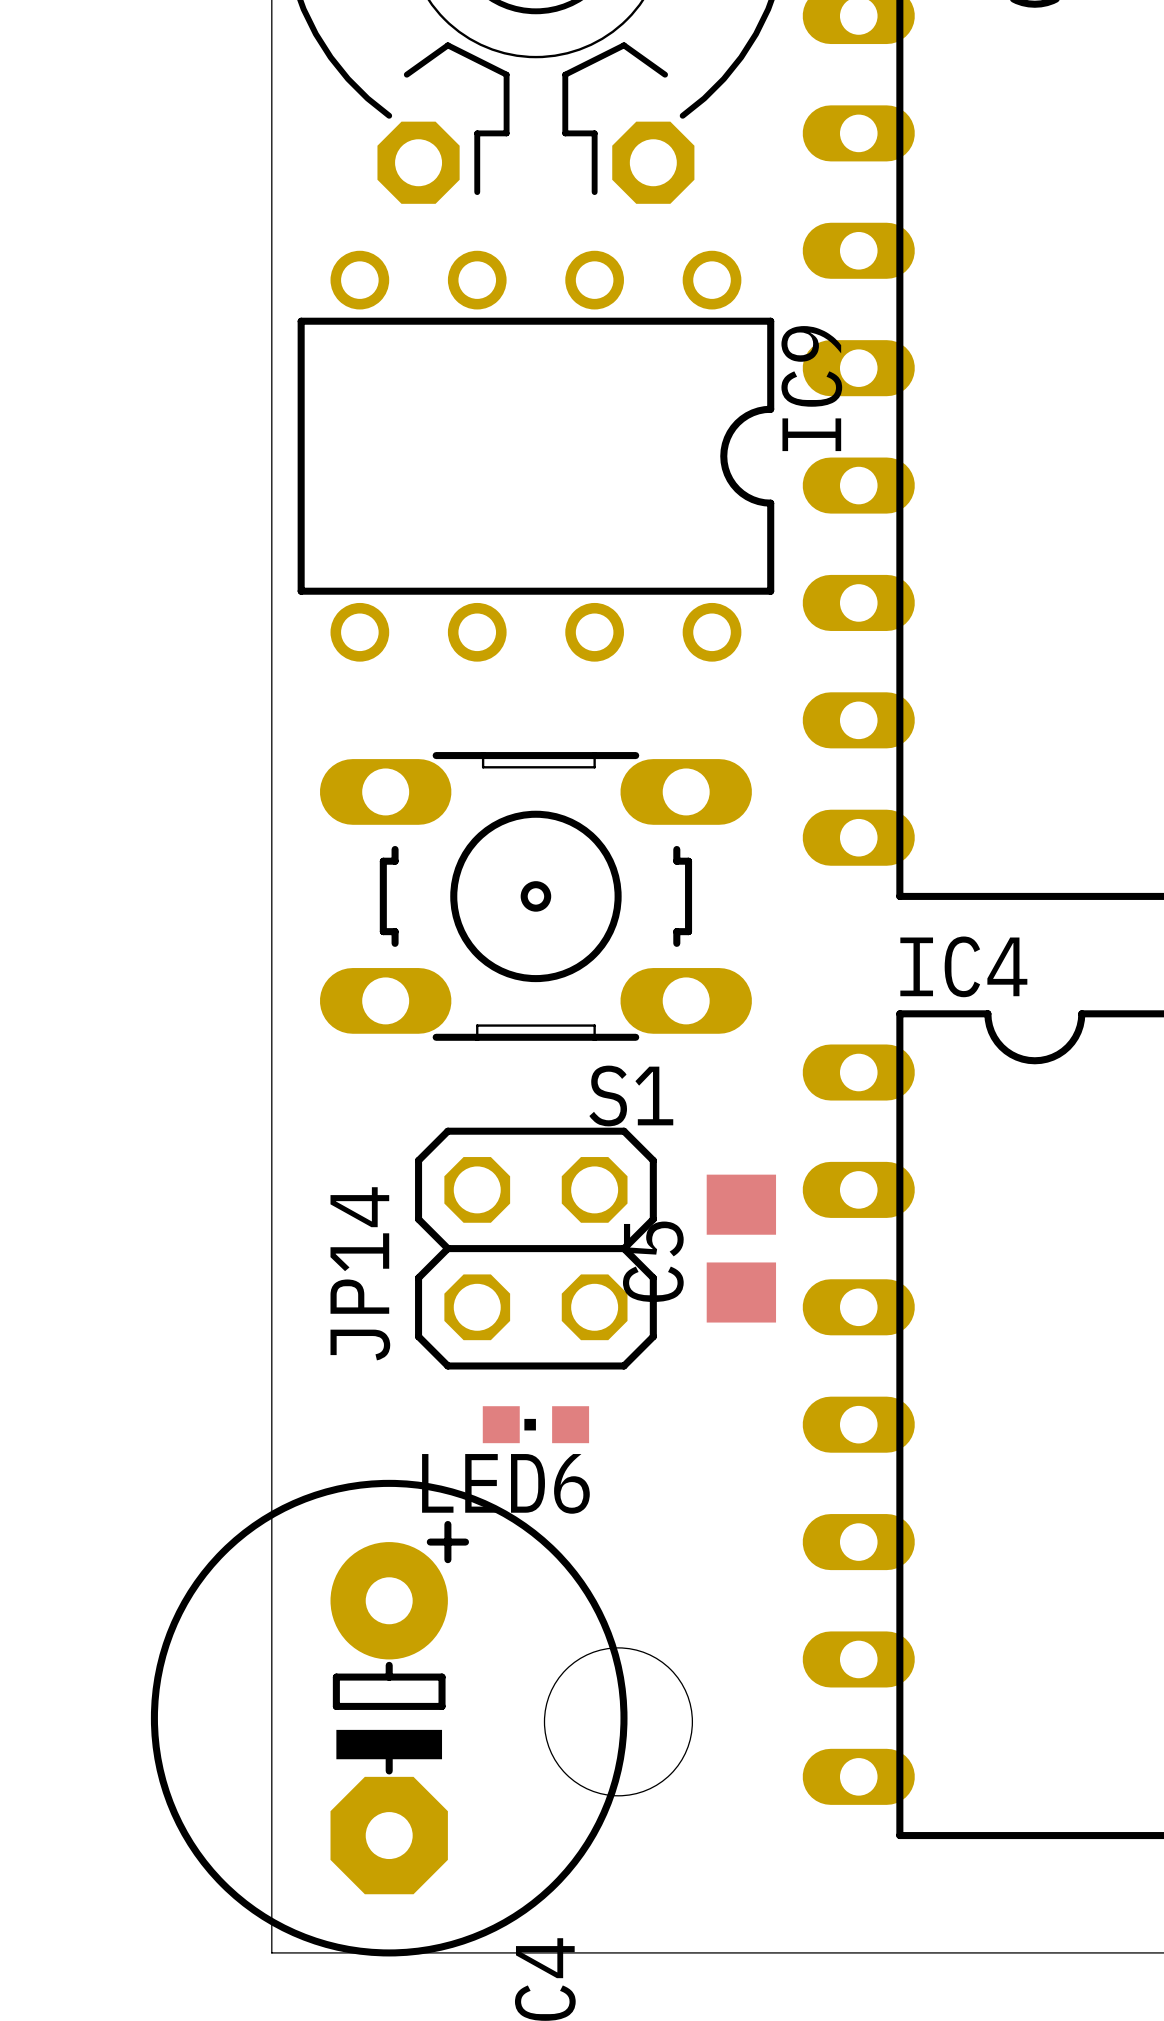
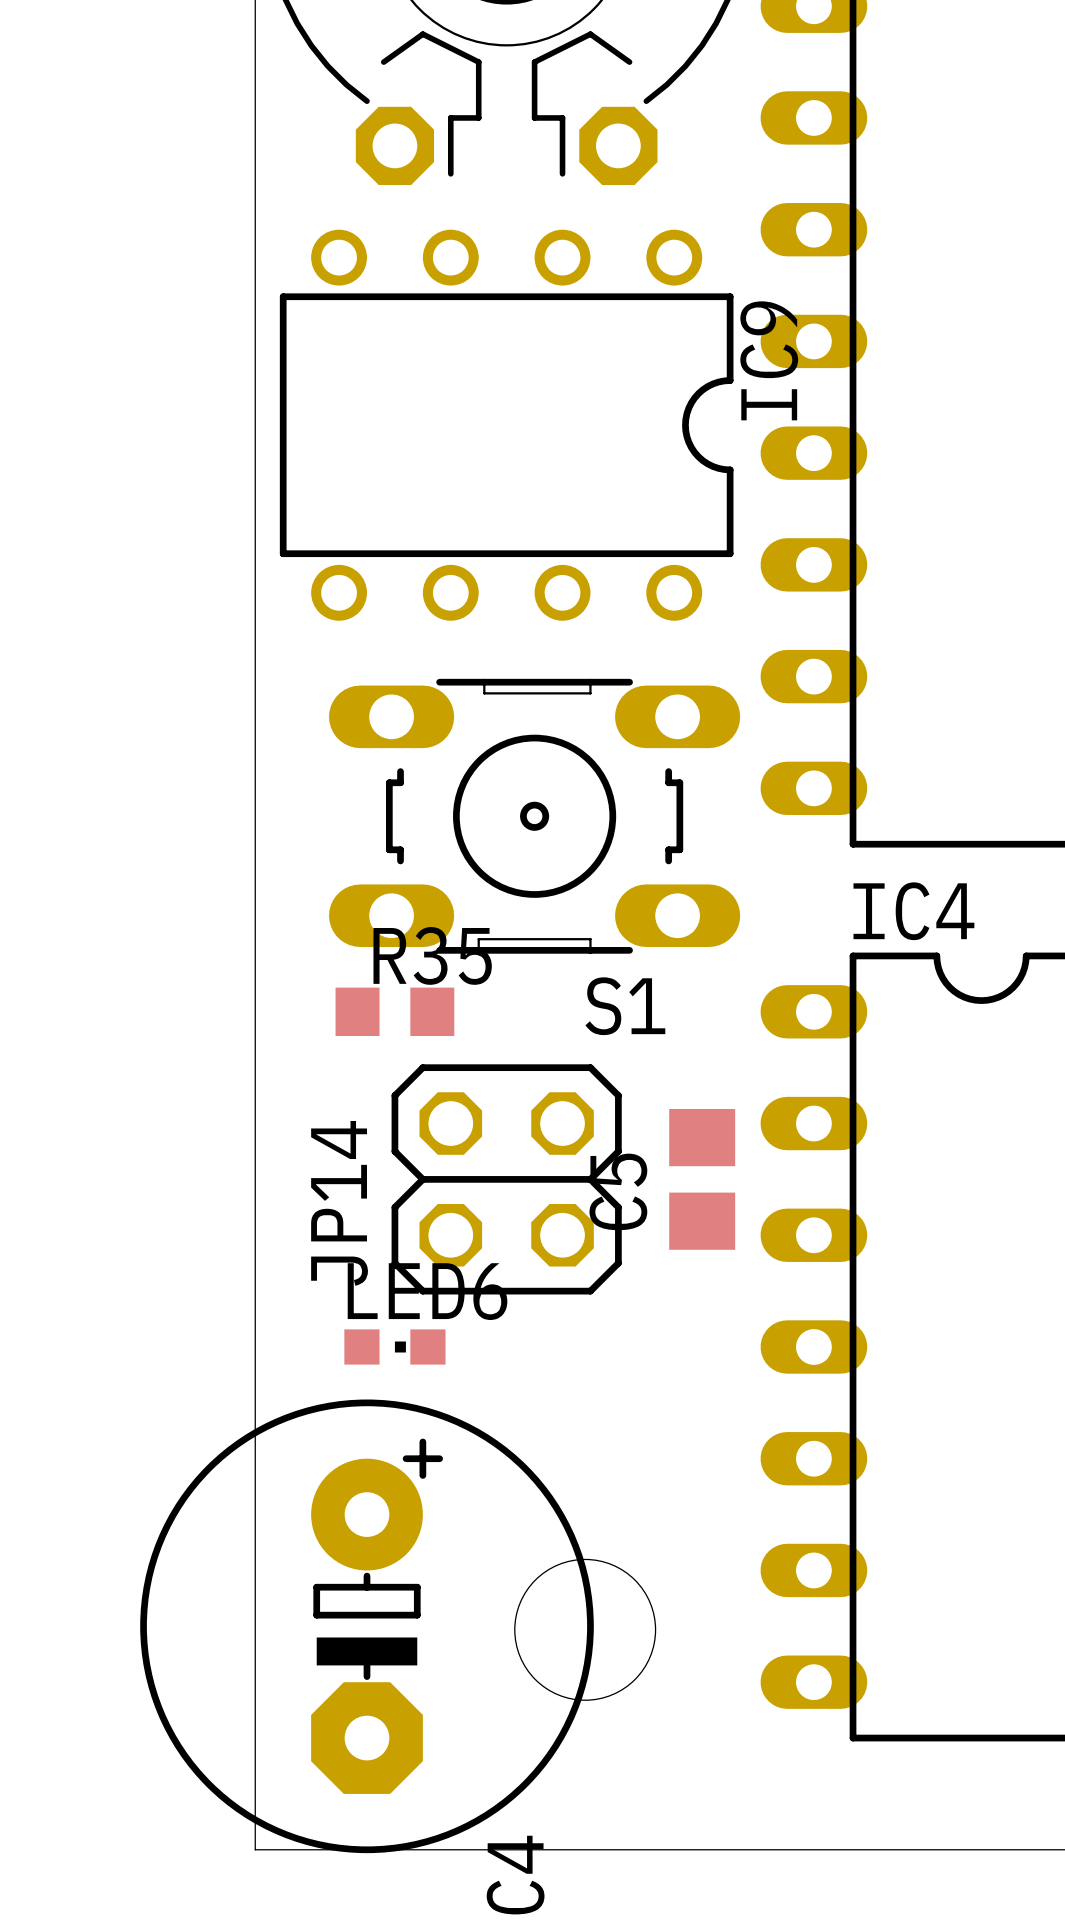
S1 position: (535, 896) -> (534, 816)
R35: none -> (394, 1011)
LED6 rotation: 0° (535, 1424) -> 180° (394, 1346)
LED6 position: (535, 1424) -> (394, 1346)

